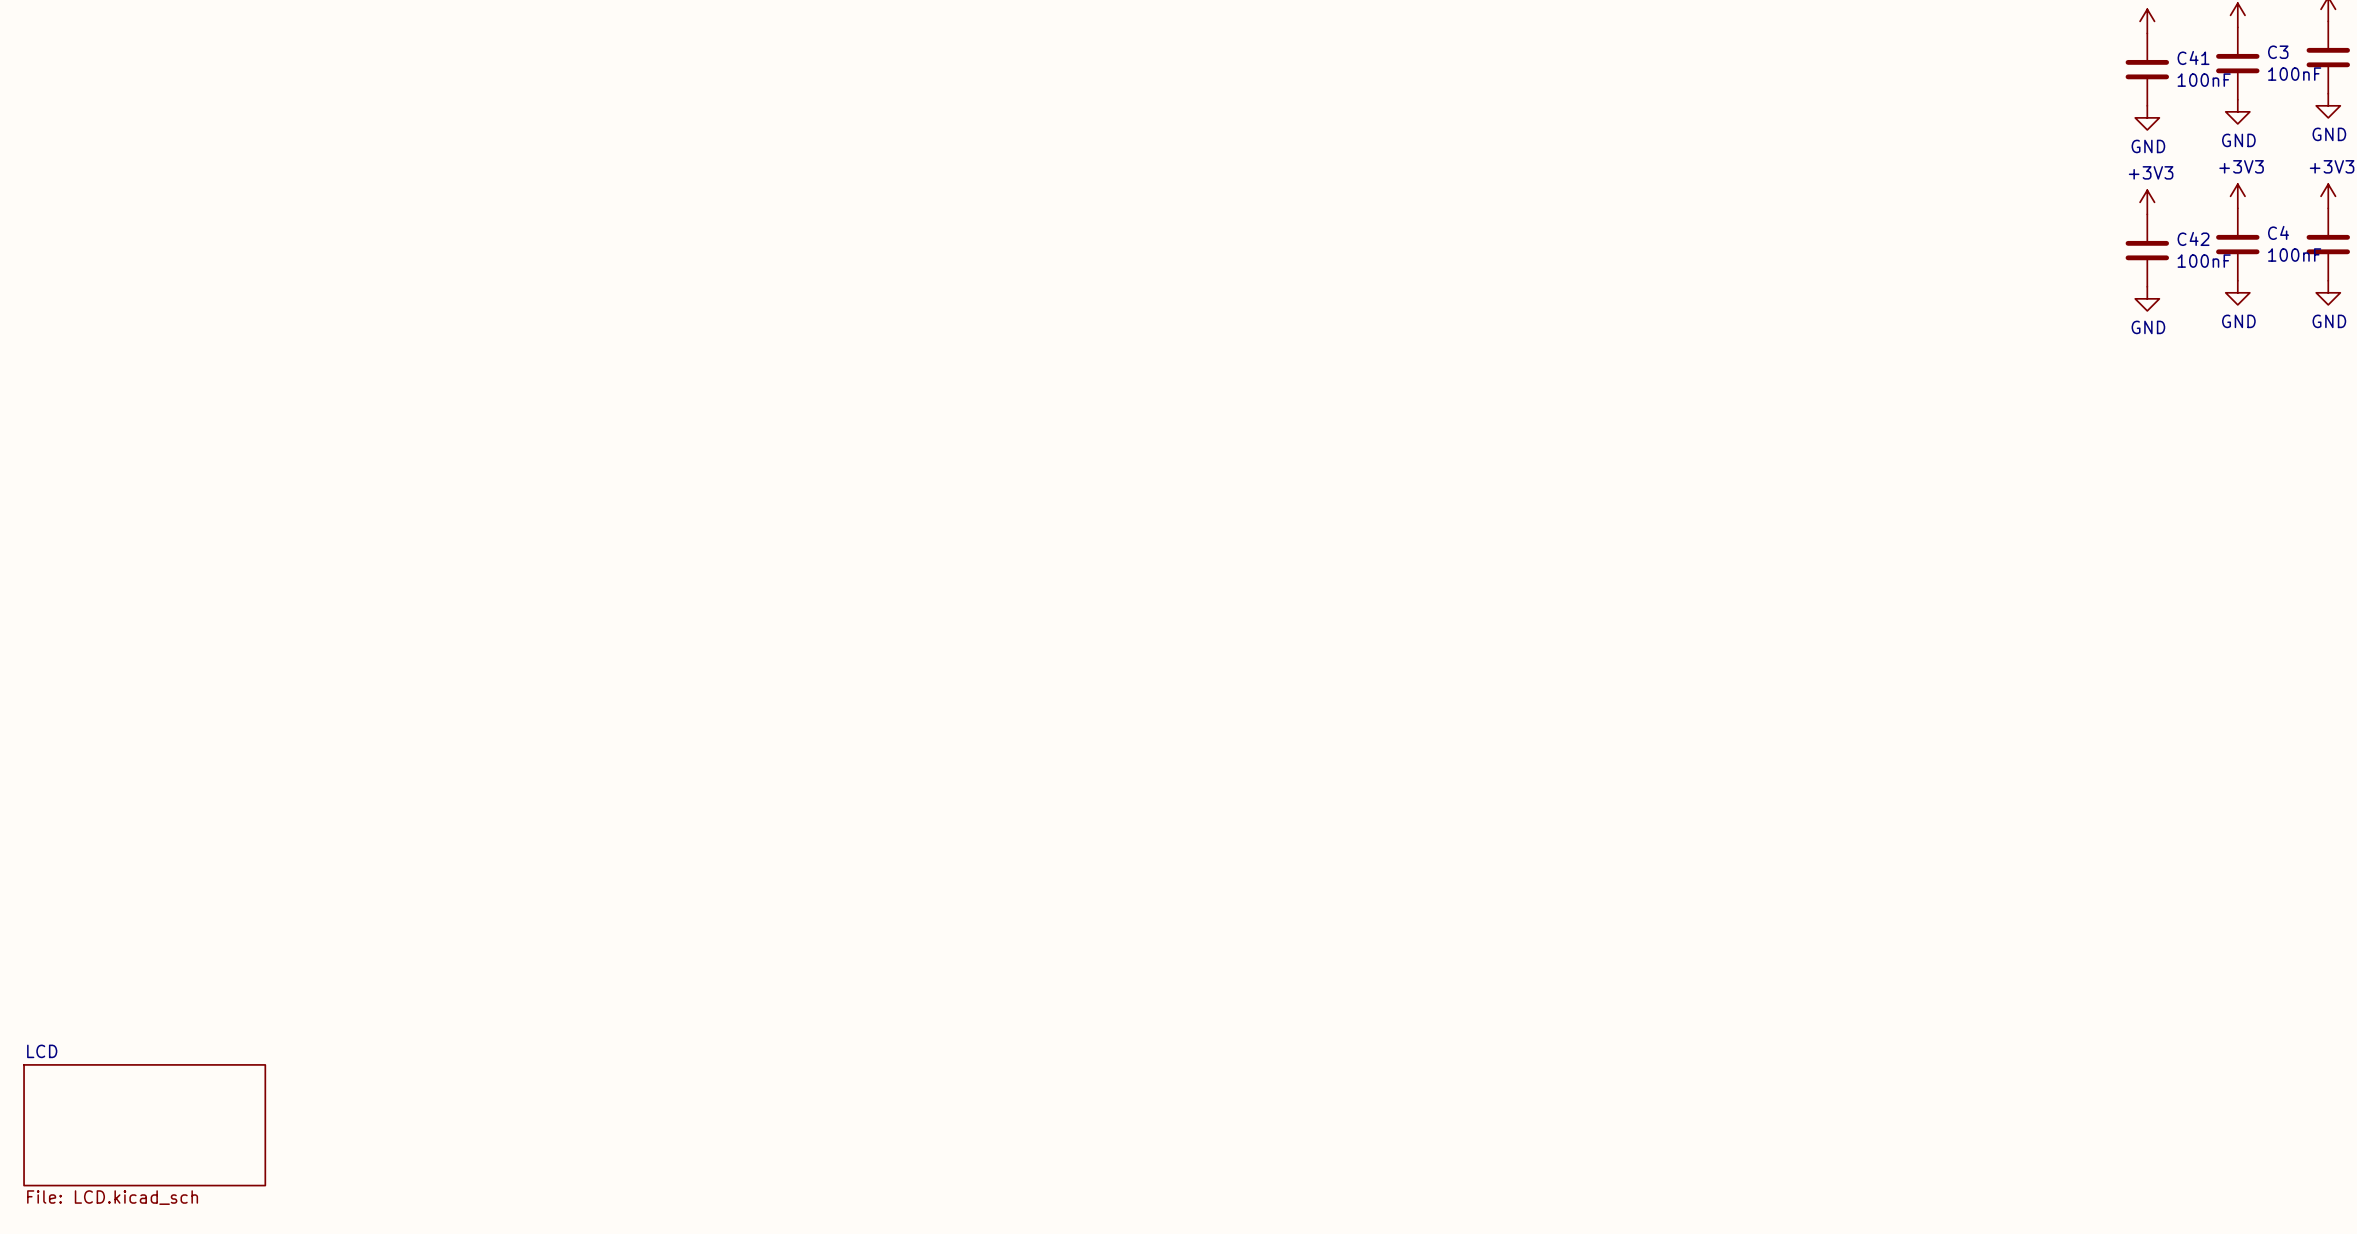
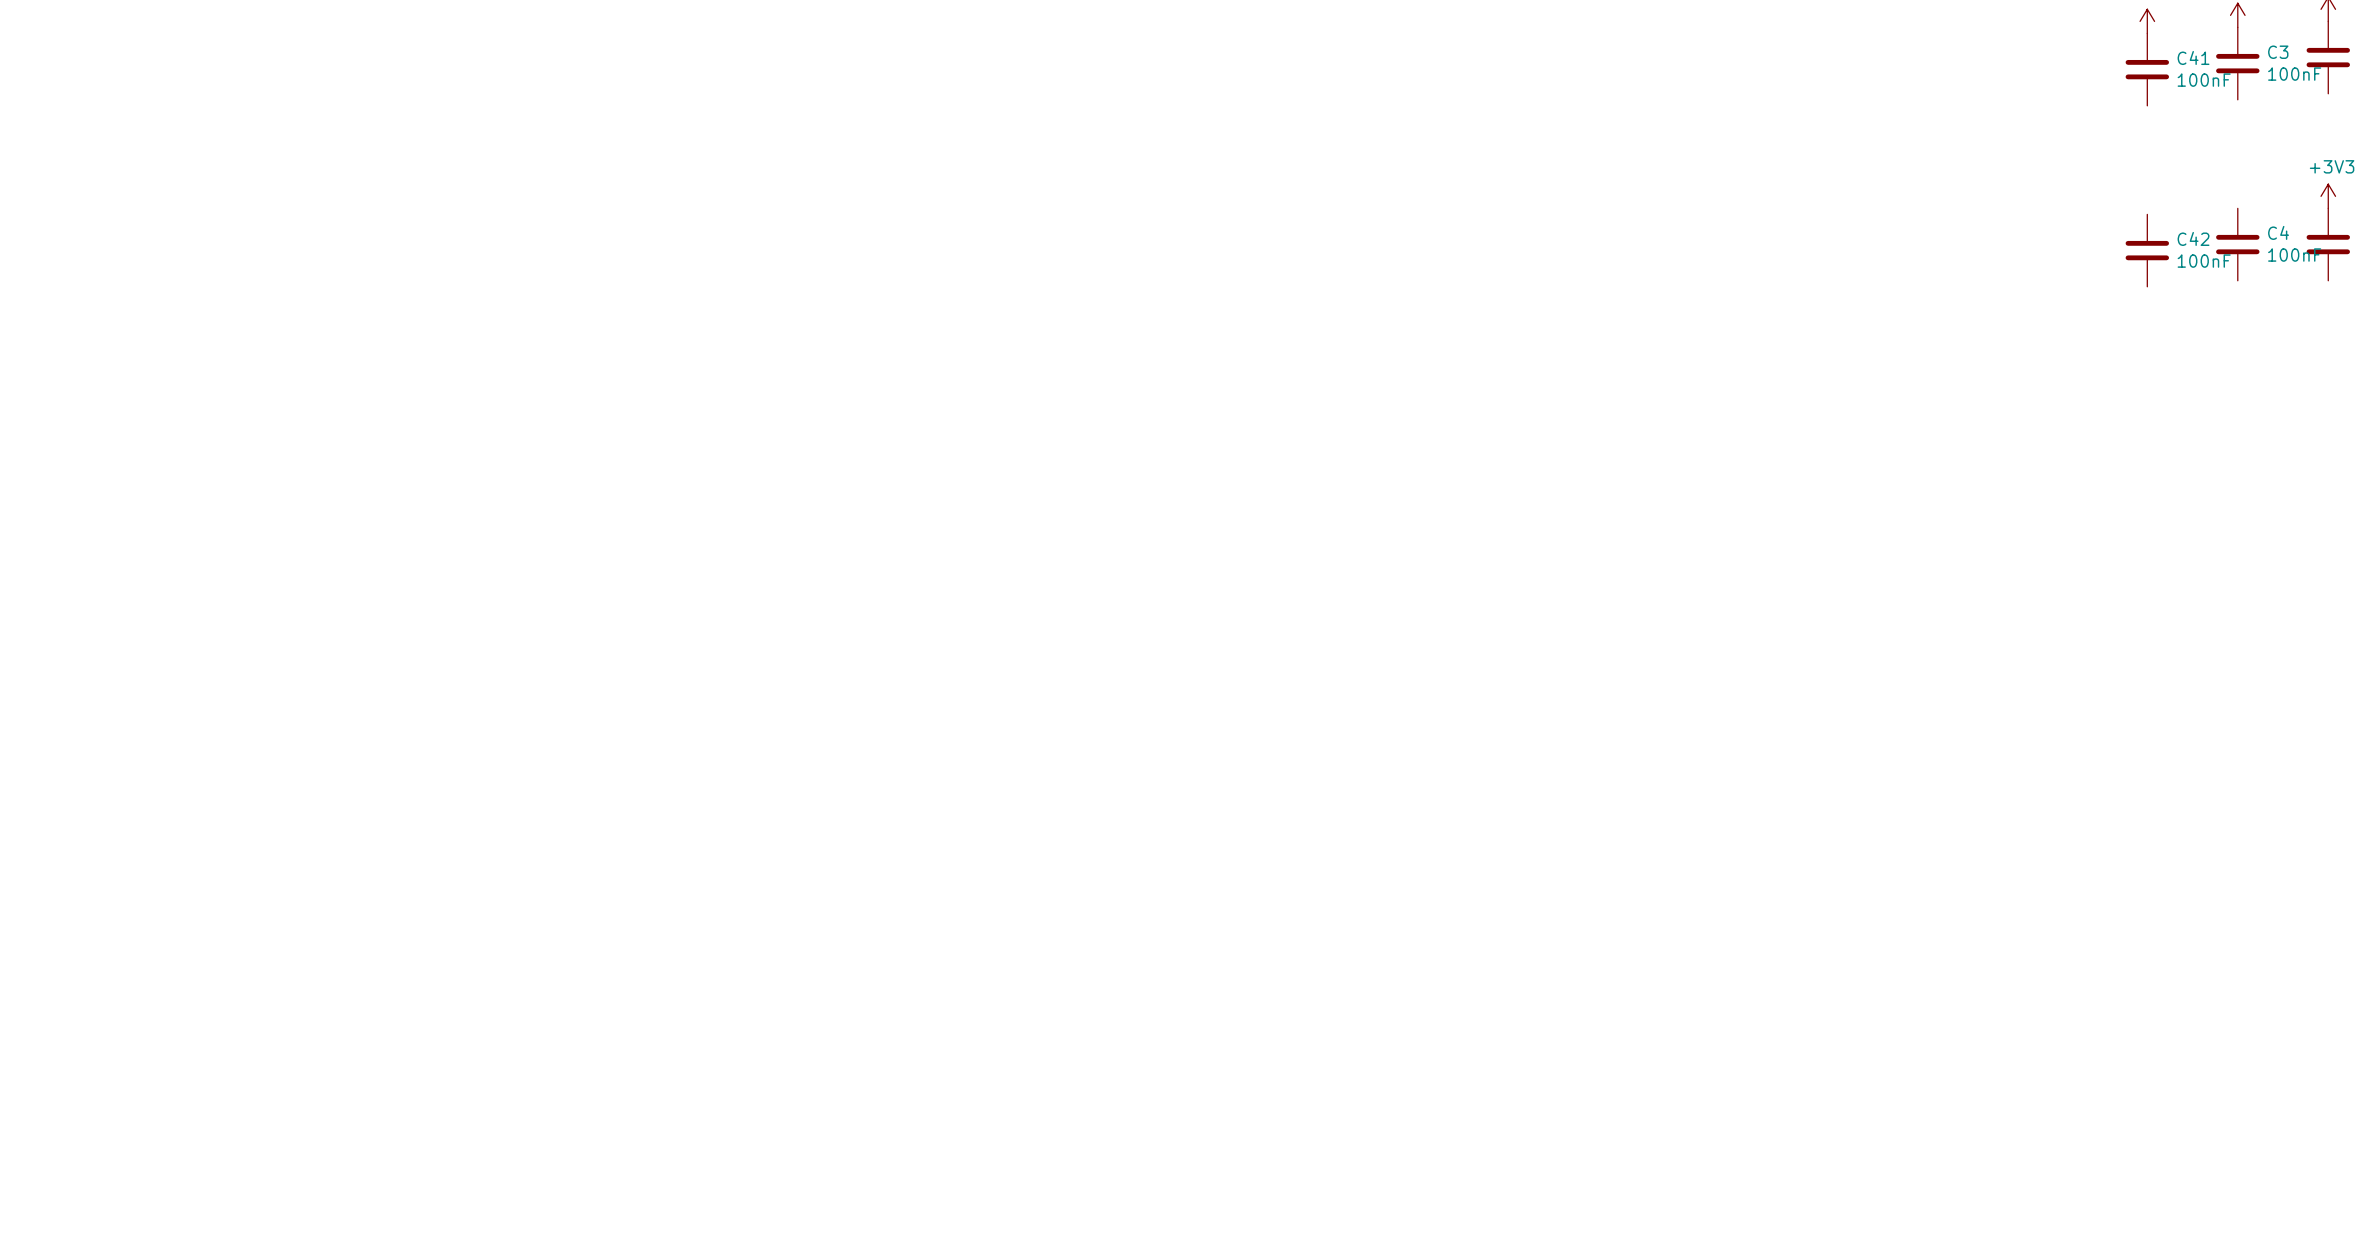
power symbol: GND (2328, 105) -> none
power symbol: GND (2237, 111) -> none
power symbol: GND (2147, 117) -> none
power symbol: +3V3 (2237, 196) -> none
power symbol: +3V3 (2147, 202) -> none
power symbol: GND (2237, 292) -> none
power symbol: GND (2328, 292) -> none
power symbol: GND (2147, 298) -> none
sheet LCD: File: LCD.kicad_sch (144, 1125) -> none

